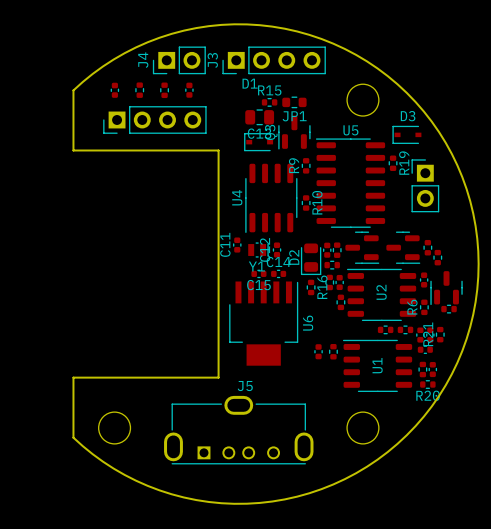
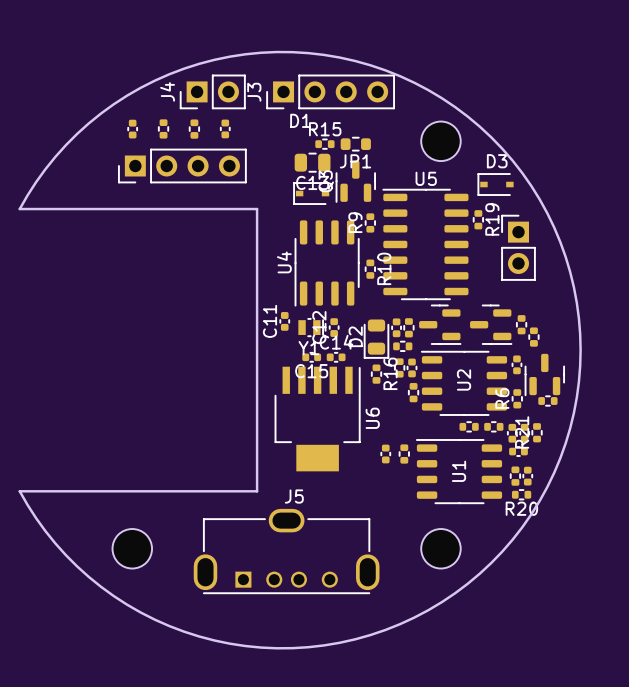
board edge: (73, 90) (73, 150) (218, 150) (218, 377) (73, 377) (73, 437) (113, 468) (147, 485) (183, 497) (234, 503) (272, 501) (321, 489) (367, 466) (406, 435) (439, 396) (457, 362) (473, 314) (478, 276) (475, 226) (462, 177) (439, 132) (415, 102) (377, 68) (333, 43) (284, 28) (246, 24) (196, 28) (147, 42) (113, 59) (73, 90) -> (19, 209) (45, 169) (65, 145) (88, 123) (113, 104) (140, 87) (169, 74) (199, 63) (229, 56) (261, 52) (308, 53) (339, 57) (370, 65) (400, 76) (428, 90) (455, 107) (479, 126) (502, 148) (522, 173) (547, 213) (560, 242) (570, 272) (576, 302) (580, 334) (578, 381) (570, 428) (560, 458) (547, 486) (531, 514) (512, 539) (479, 573) (455, 593) (428, 610) (400, 624) (370, 635) (324, 645) (292, 648) (261, 647) (229, 643) (199, 636) (169, 626) (140, 612) (113, 596) (77, 566) (45, 531) (19, 491) (257, 491) (257, 209) (19, 209)

